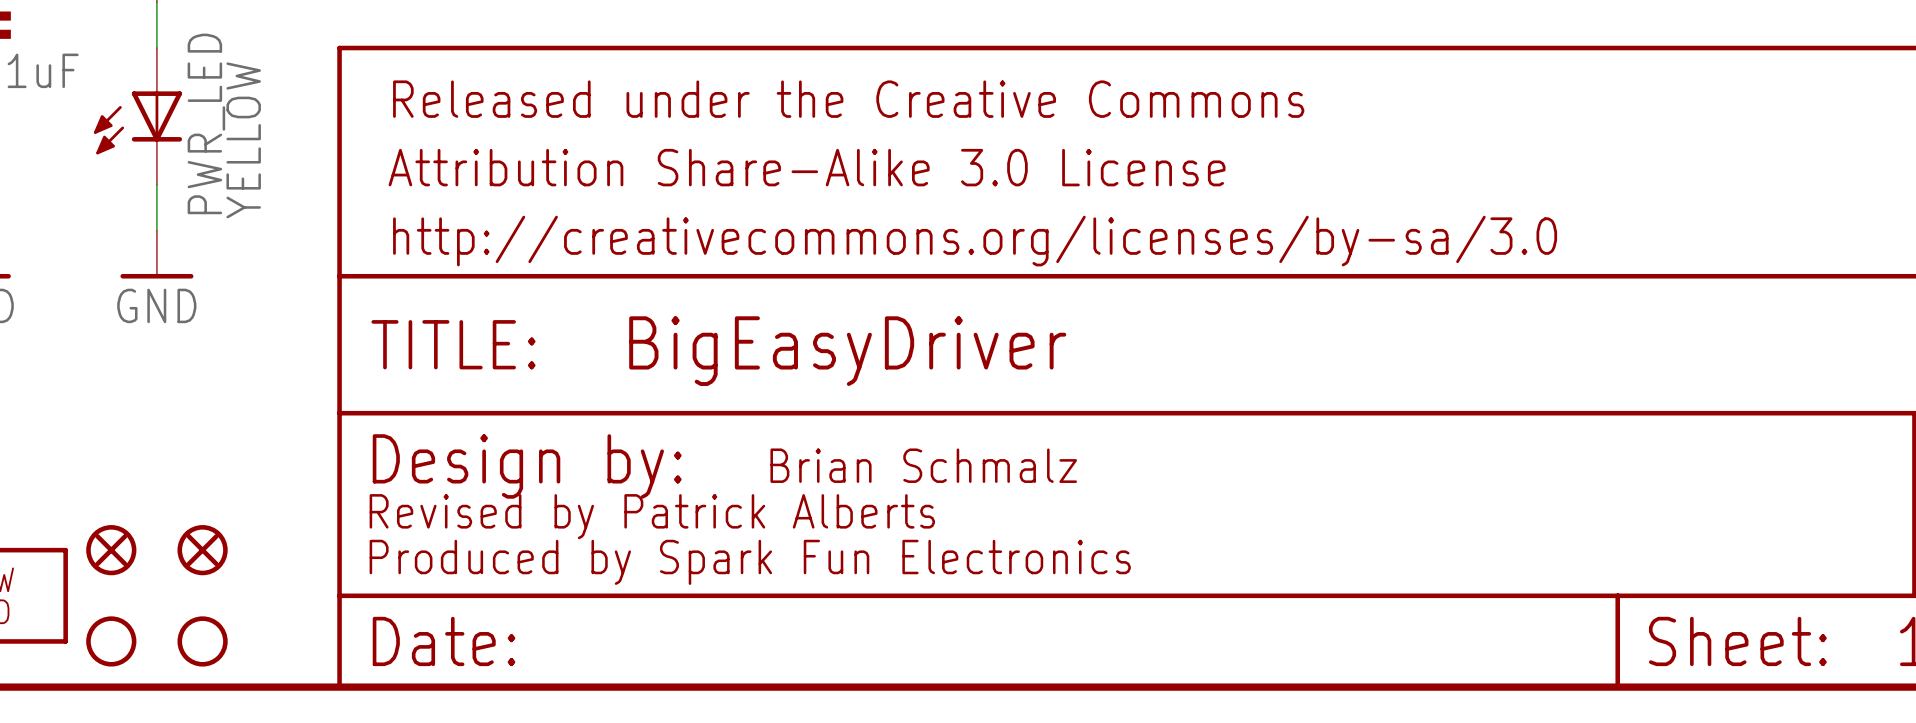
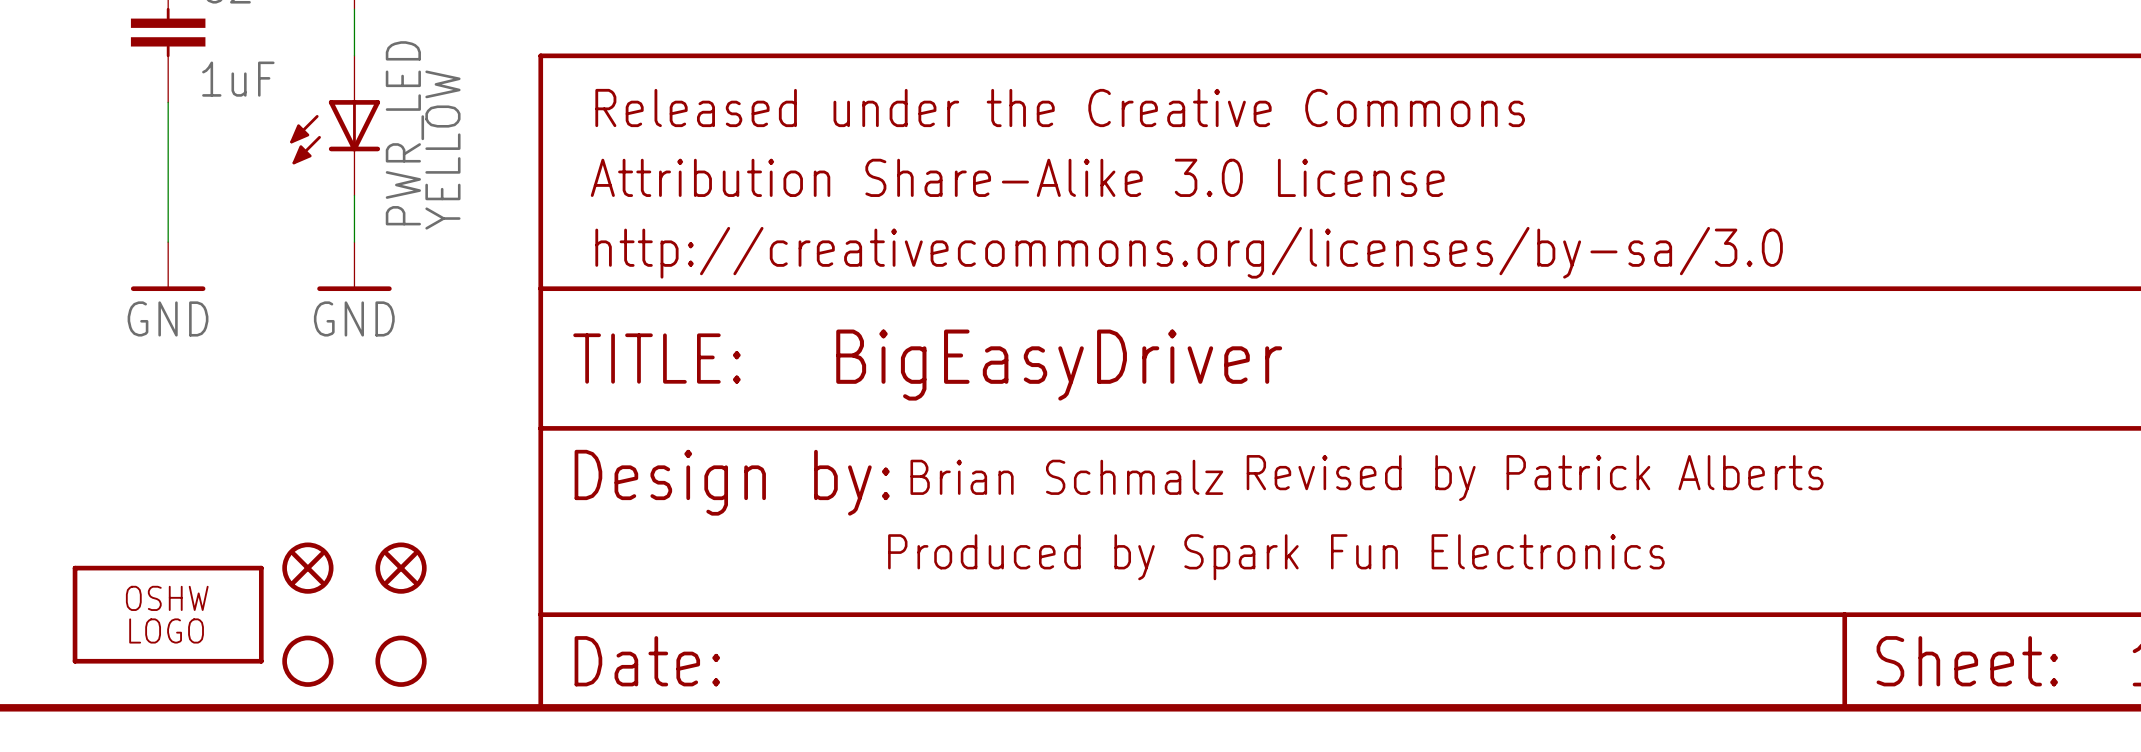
text: none -> Revised by Patrick Alberts (1535, 478)
text position: Brian Schmalz (923, 465) -> Brian Schmalz (1066, 477)
text: Revised by Patrick Alberts (652, 516) -> none
text position: Produced by Spark Fun Electronics (750, 562) -> Produced by Spark Fun Electronics (1276, 557)

